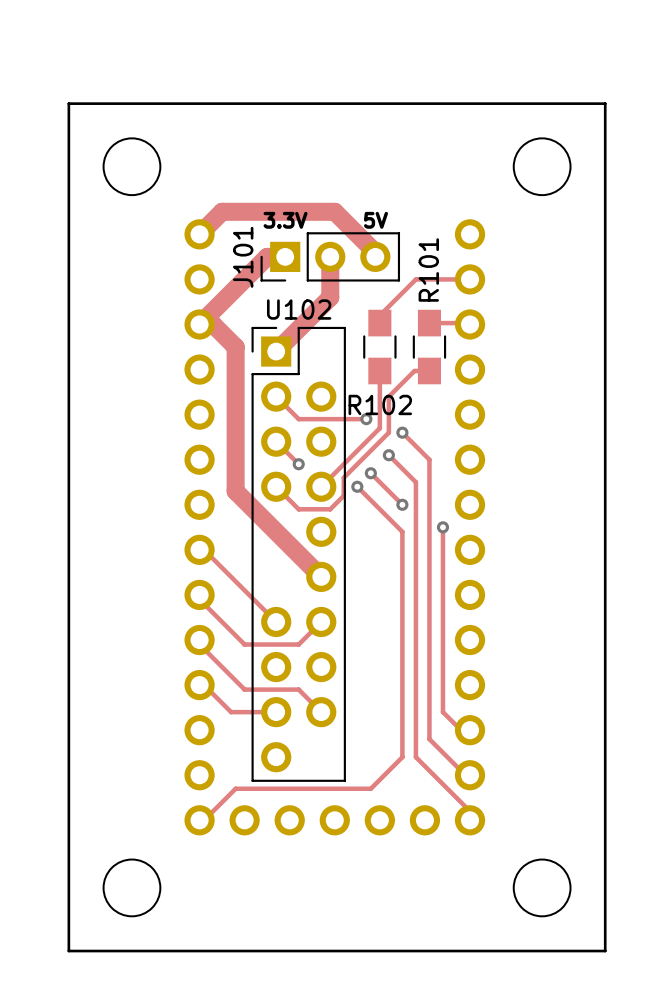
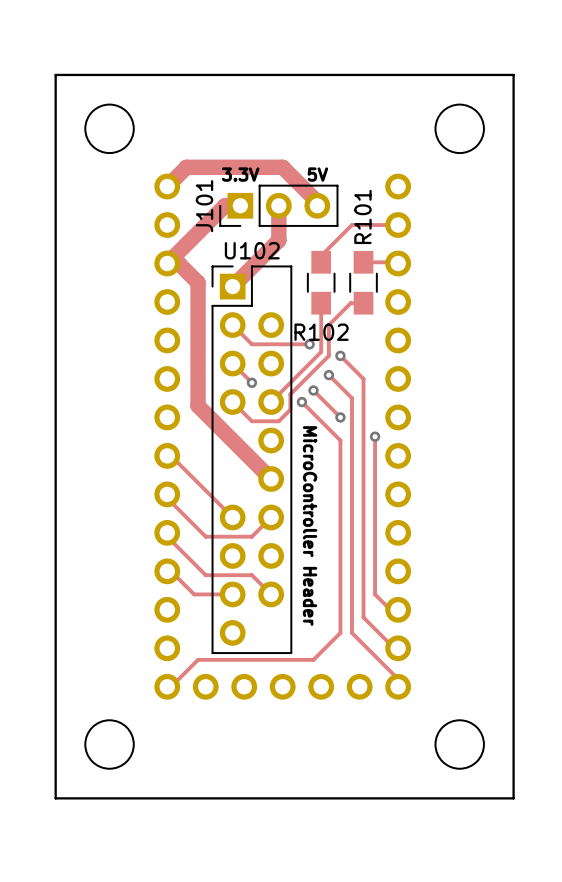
text: none -> MicroController Header (310, 525)

